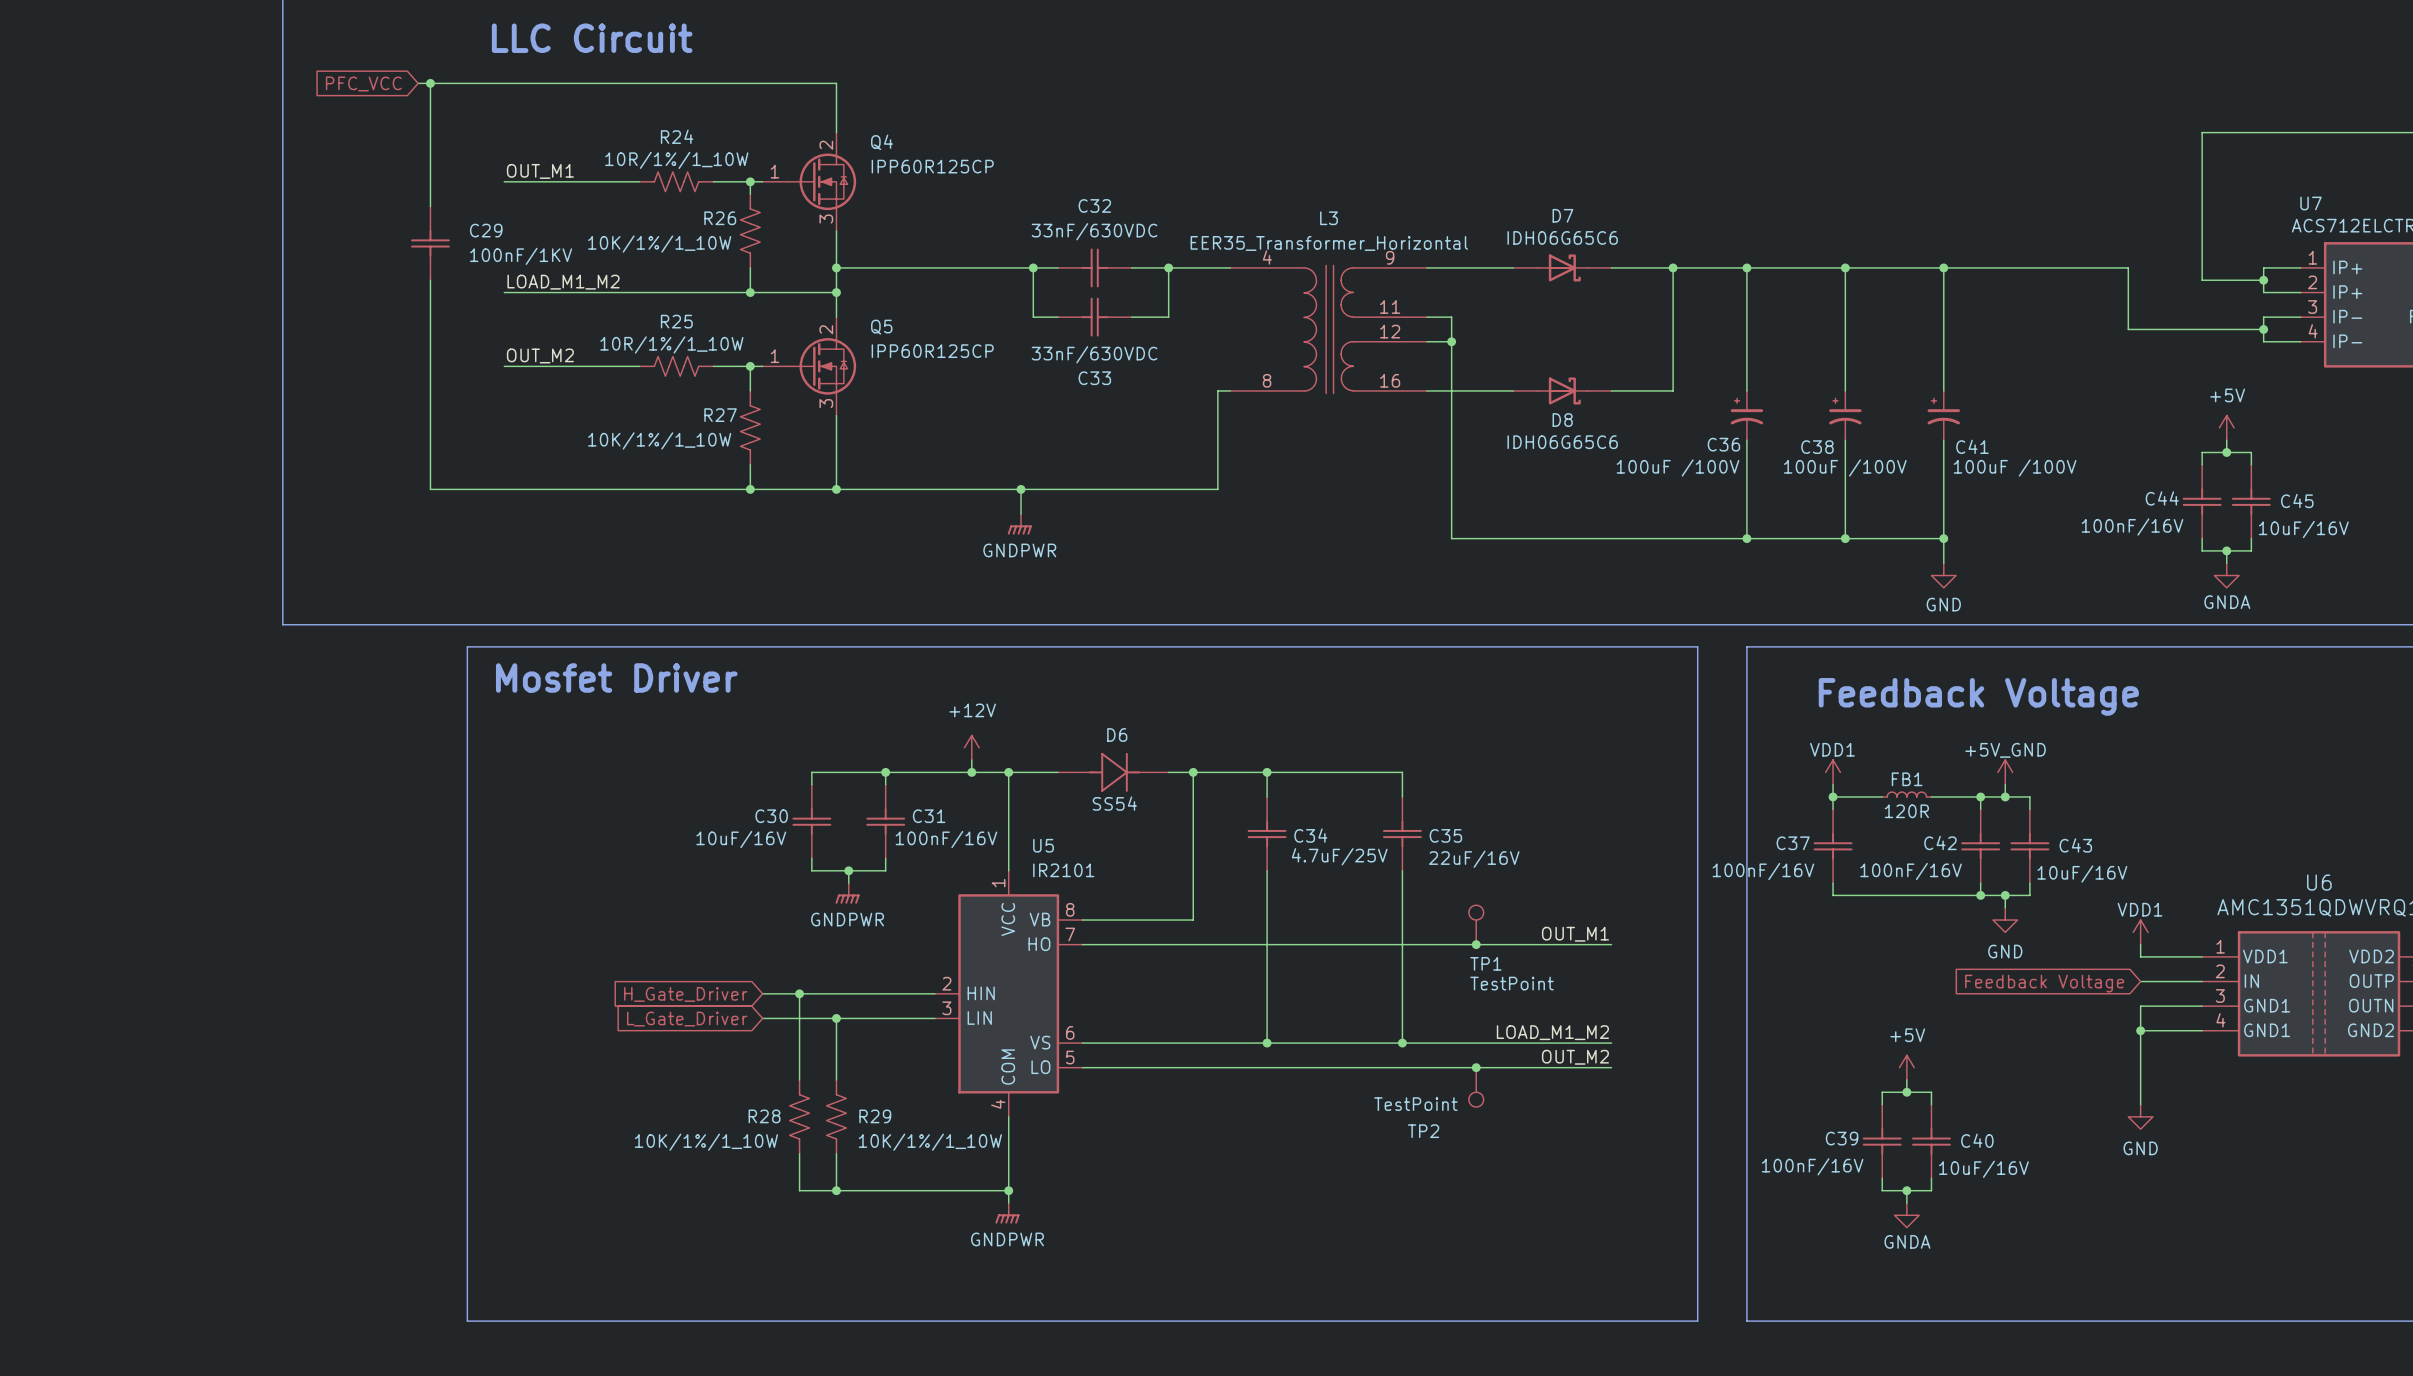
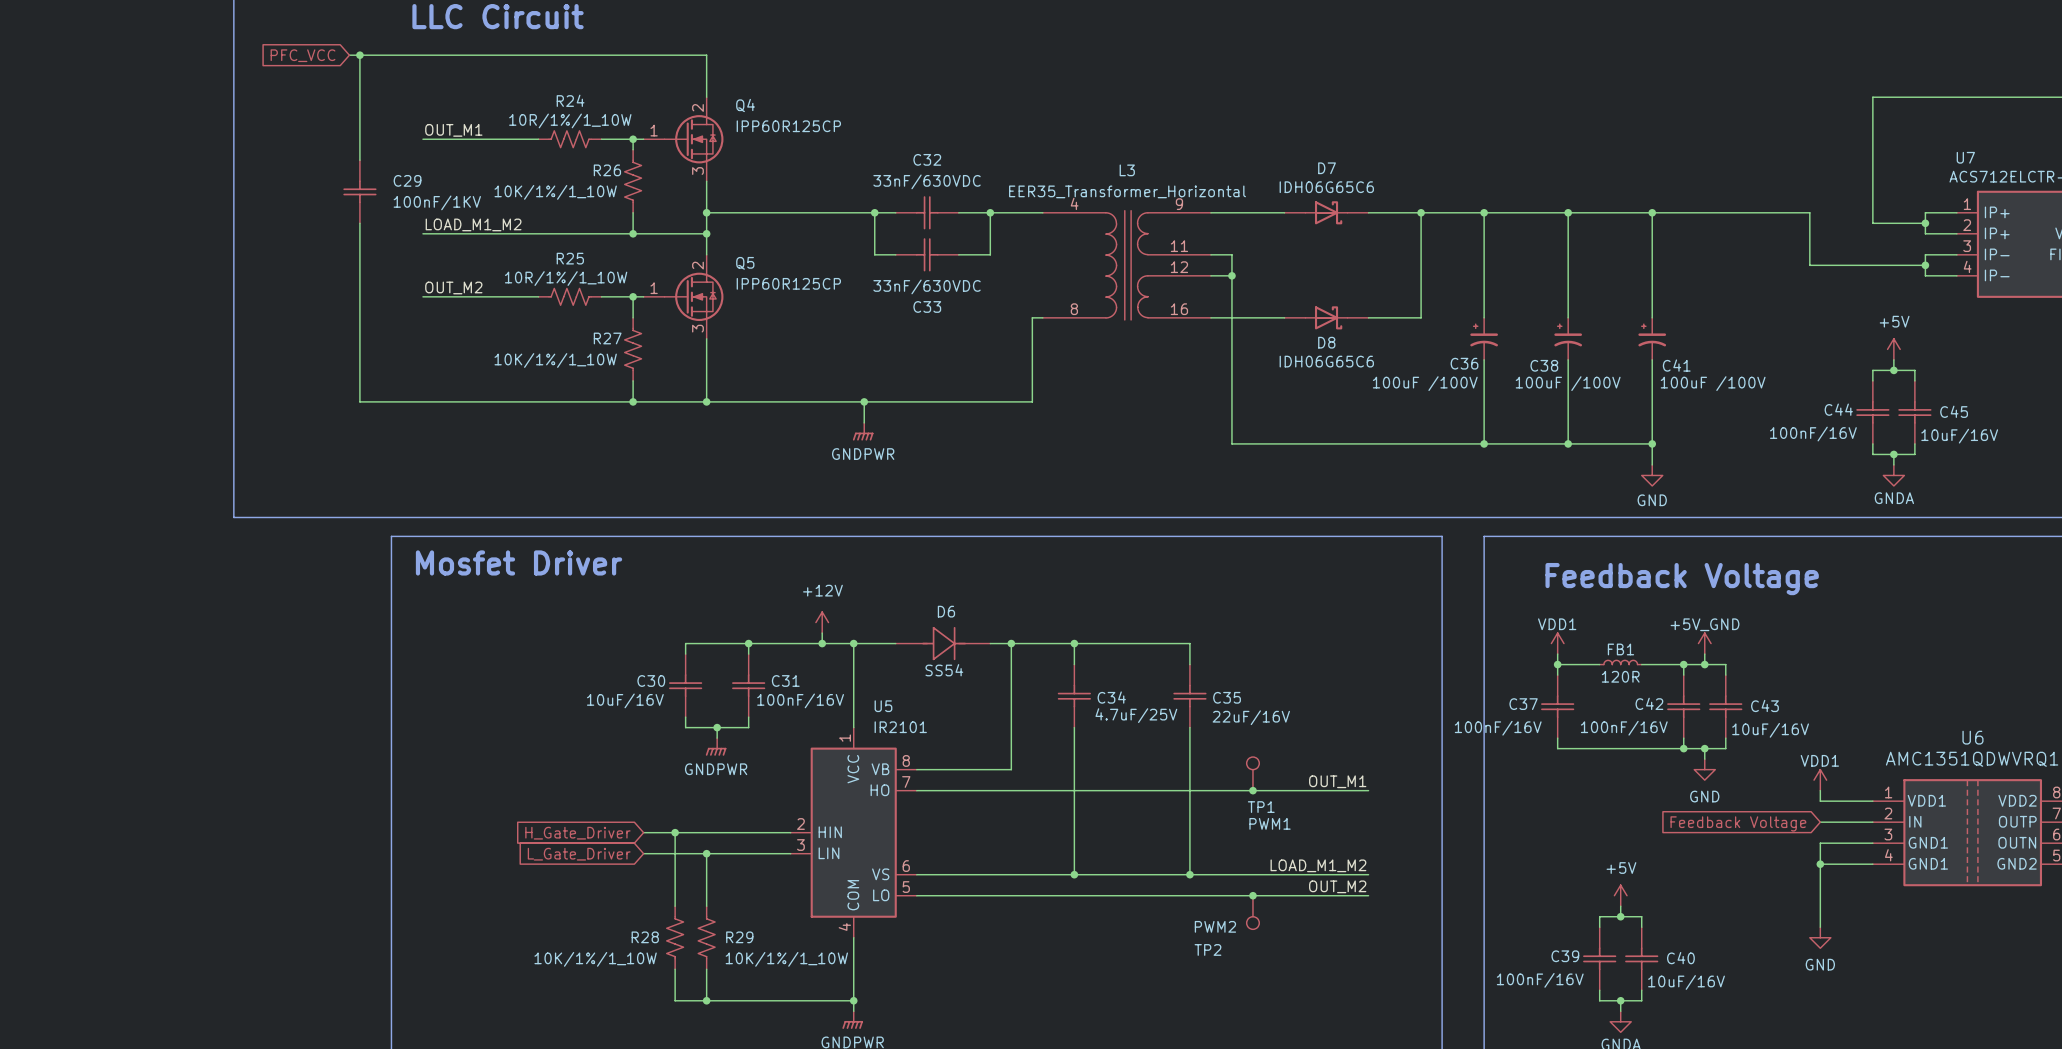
TP1 value: TestPoint (1512, 983) -> PWM1 (1270, 823)
TP2 value: TestPoint (1415, 1104) -> PWM2 (1215, 926)

